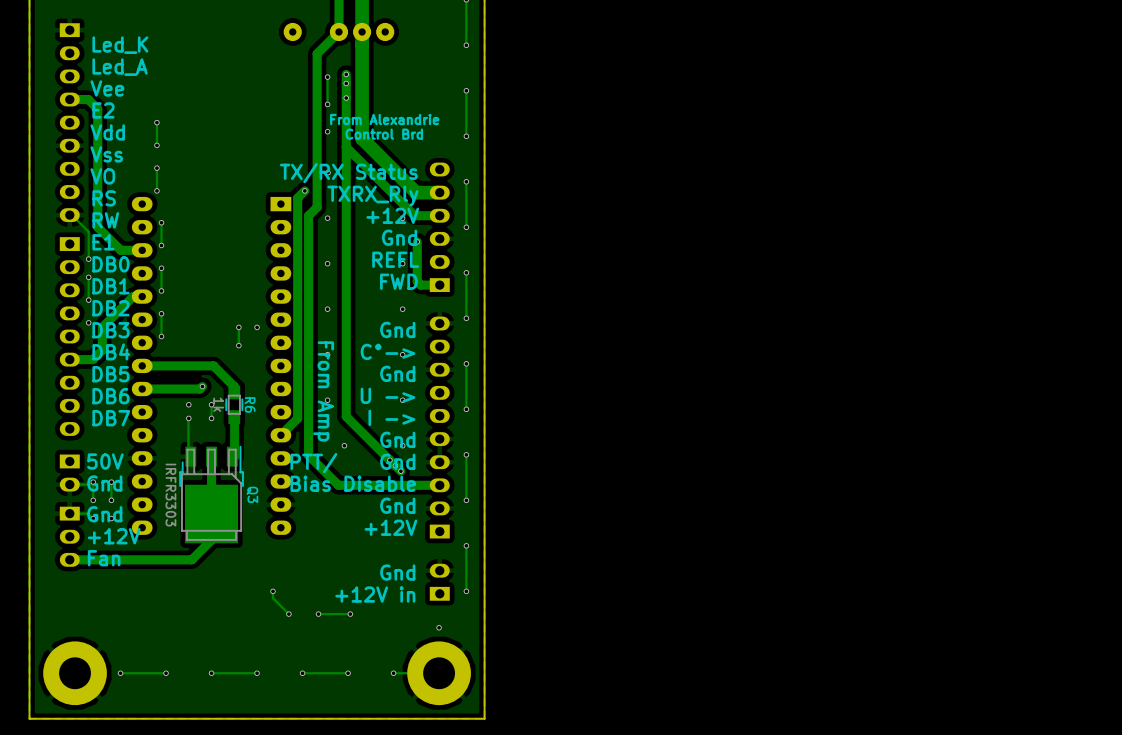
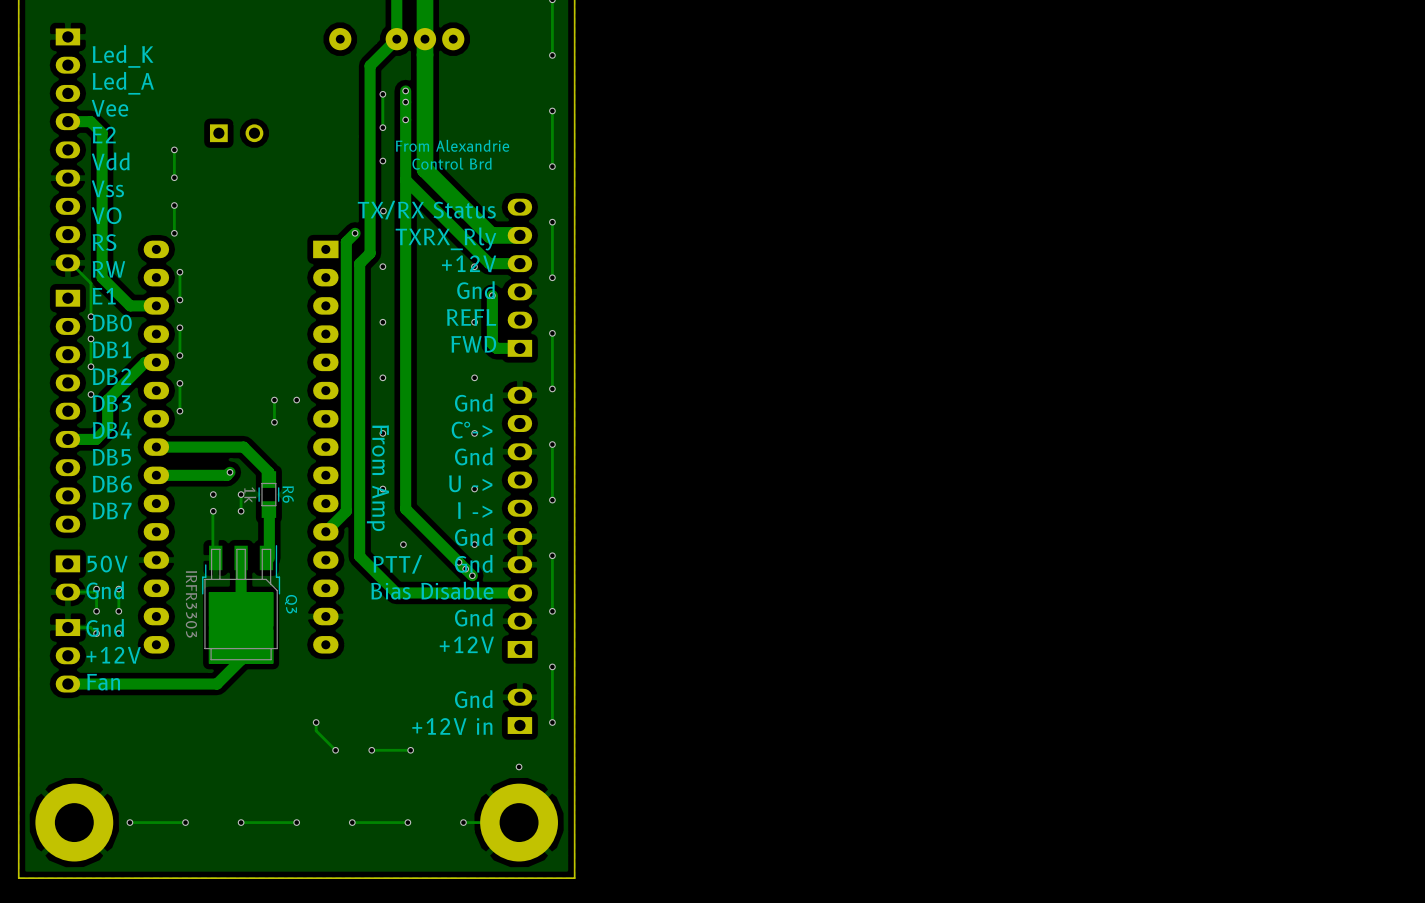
part: none -> (236, 133)

